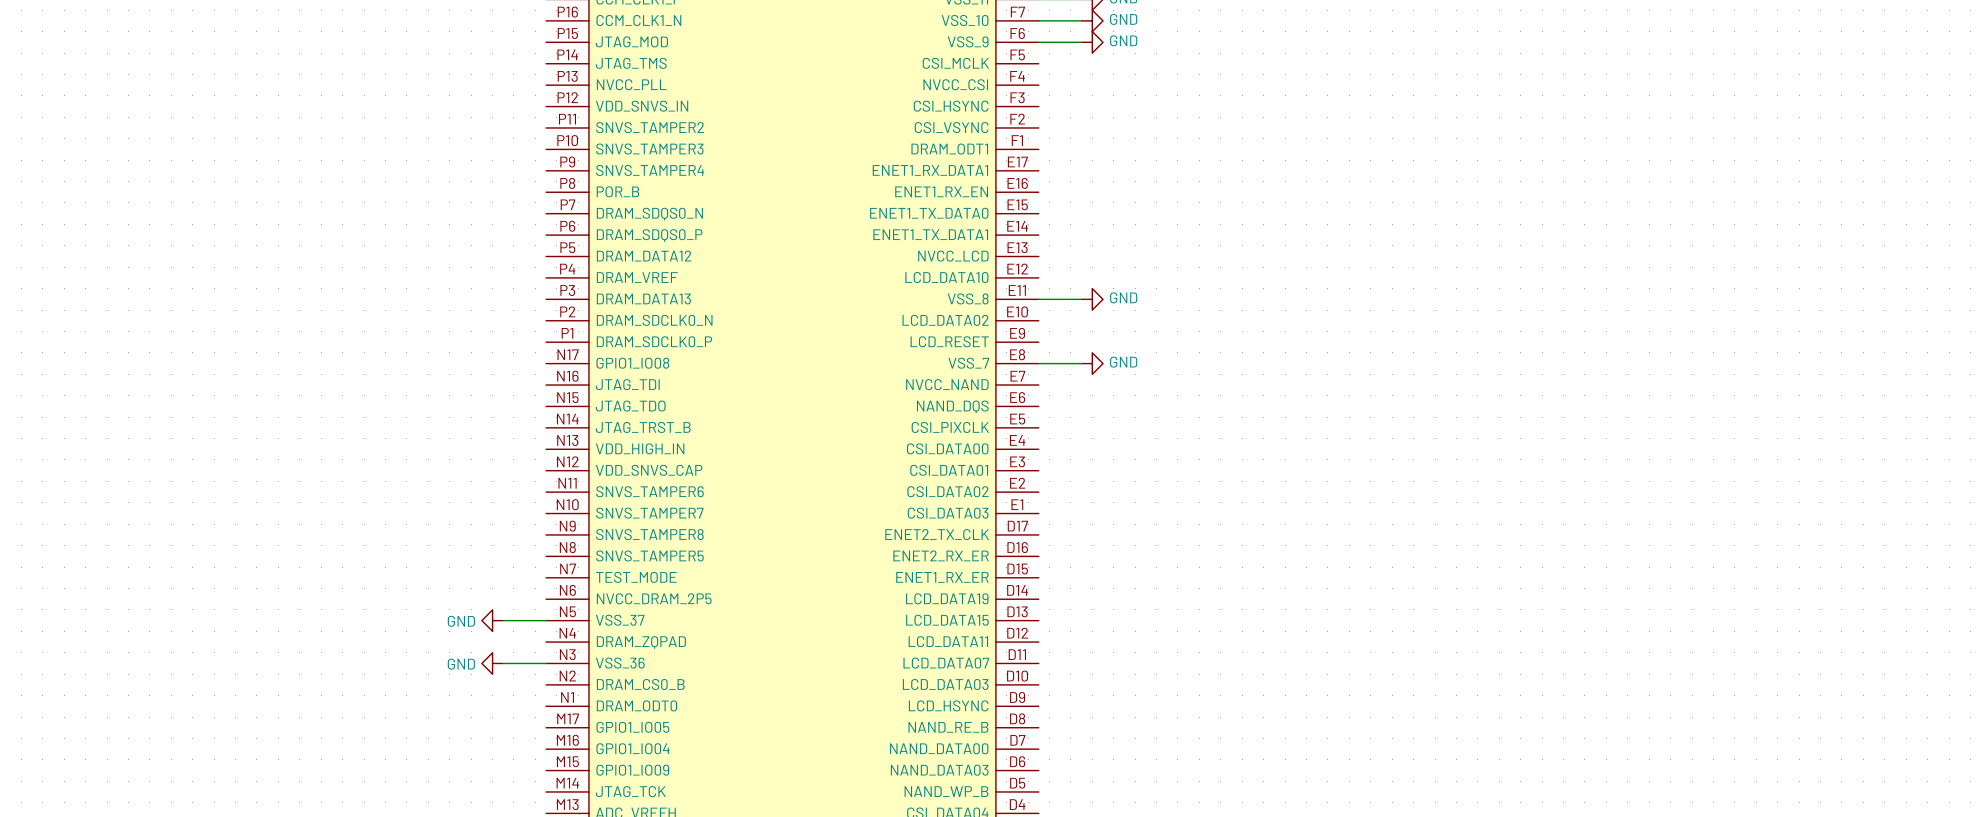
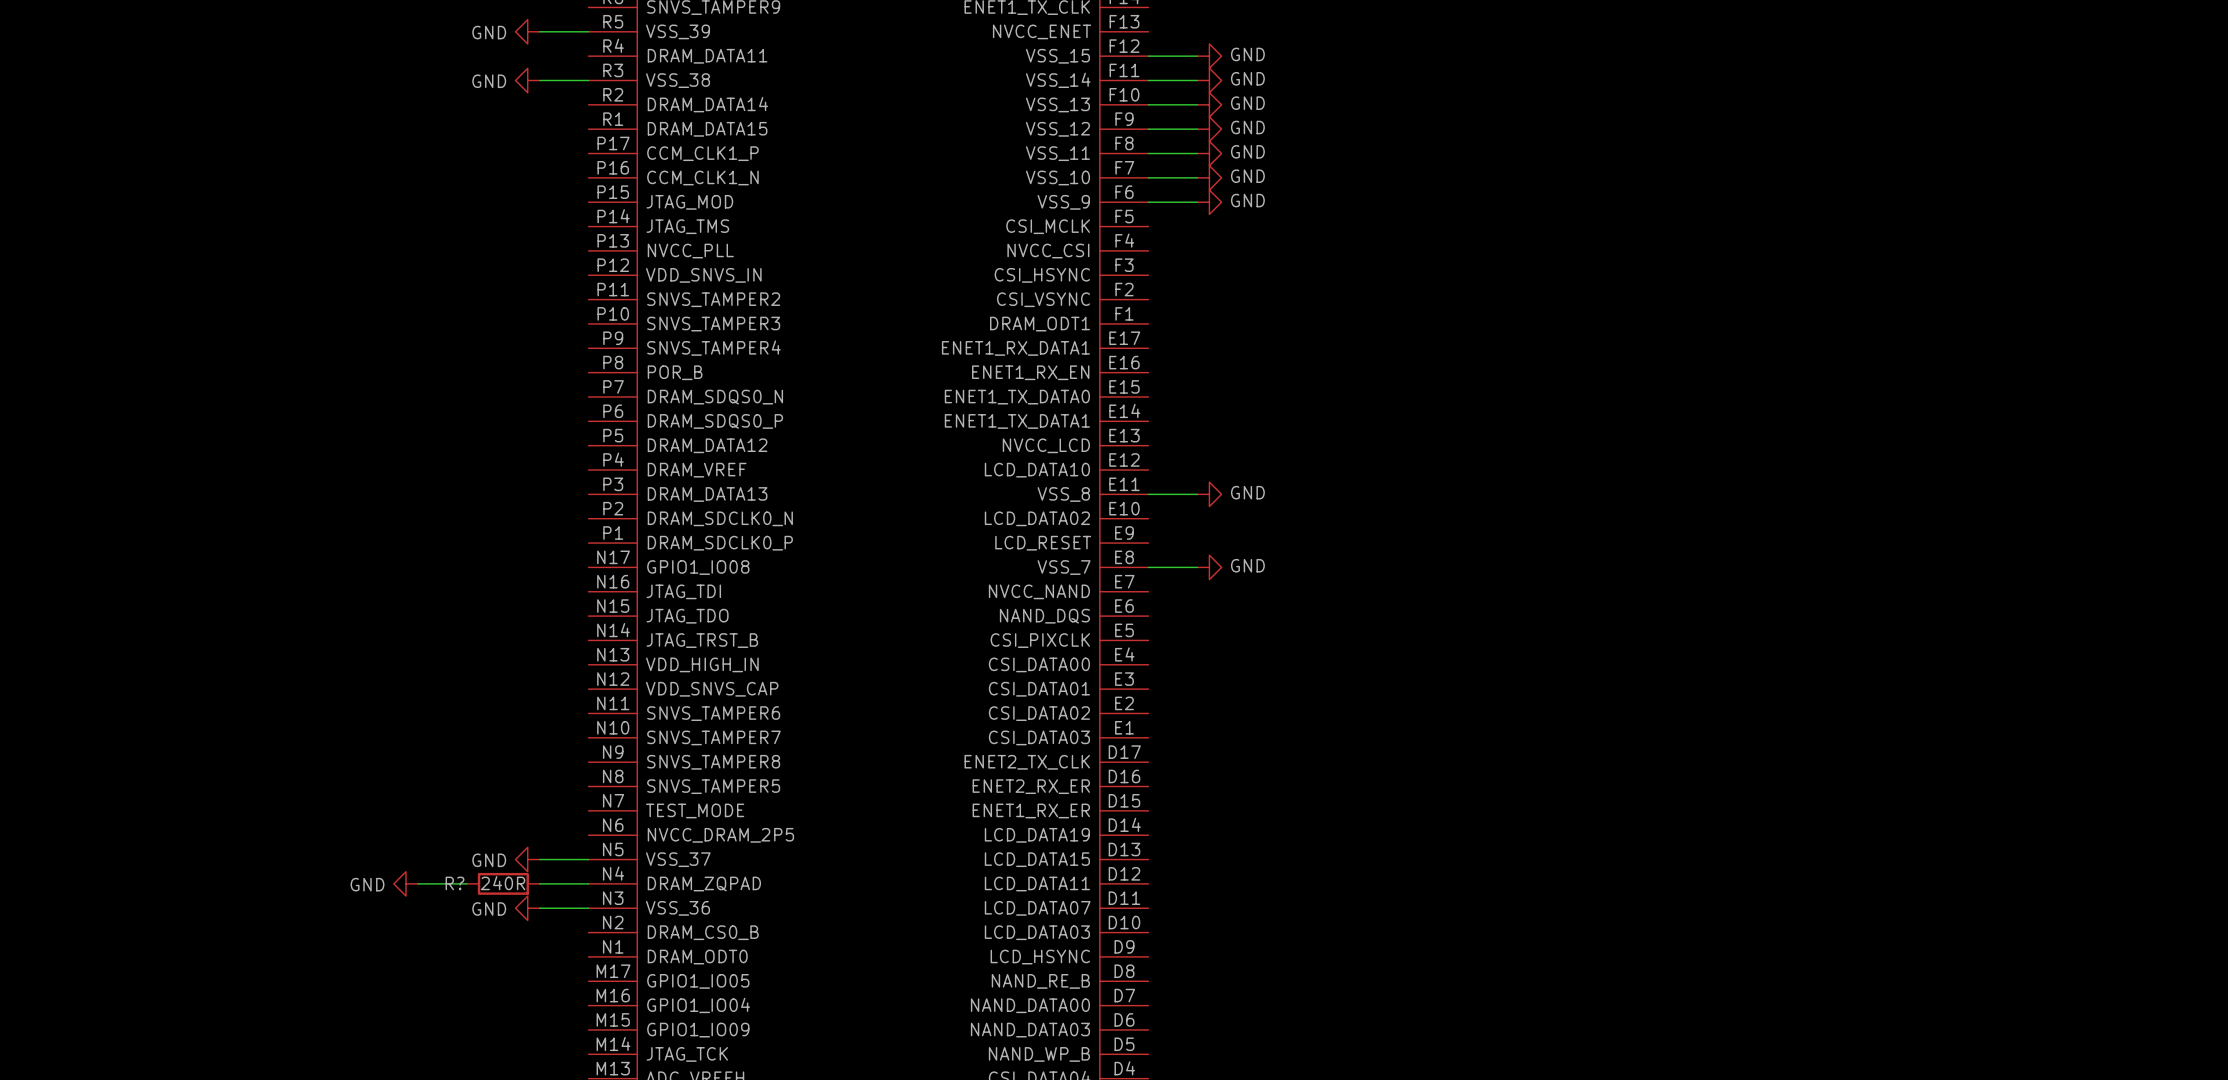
power symbol: none -> GND (406, 883)
wire: none -> (418, 883) (466, 883)
R?: none -> 240R (503, 883)
wire: none -> (539, 883) (588, 883)

